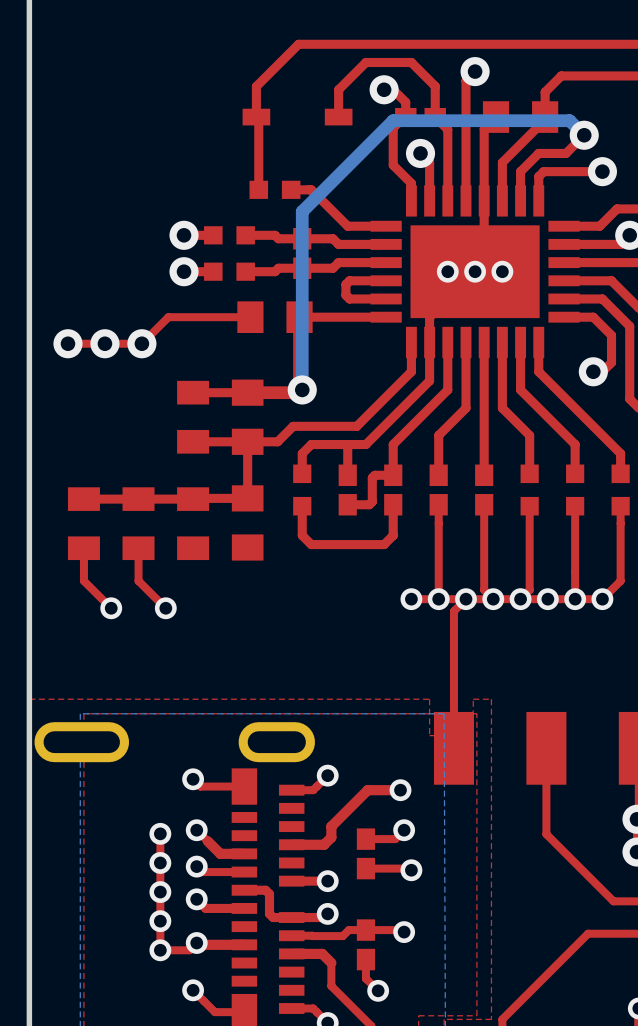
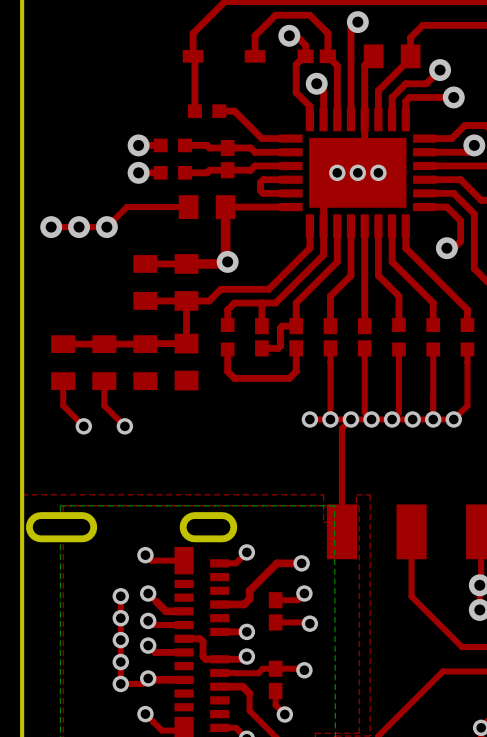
bottom track: (584, 135) (569, 120) (393, 120) (302, 211) (302, 389) -> none

